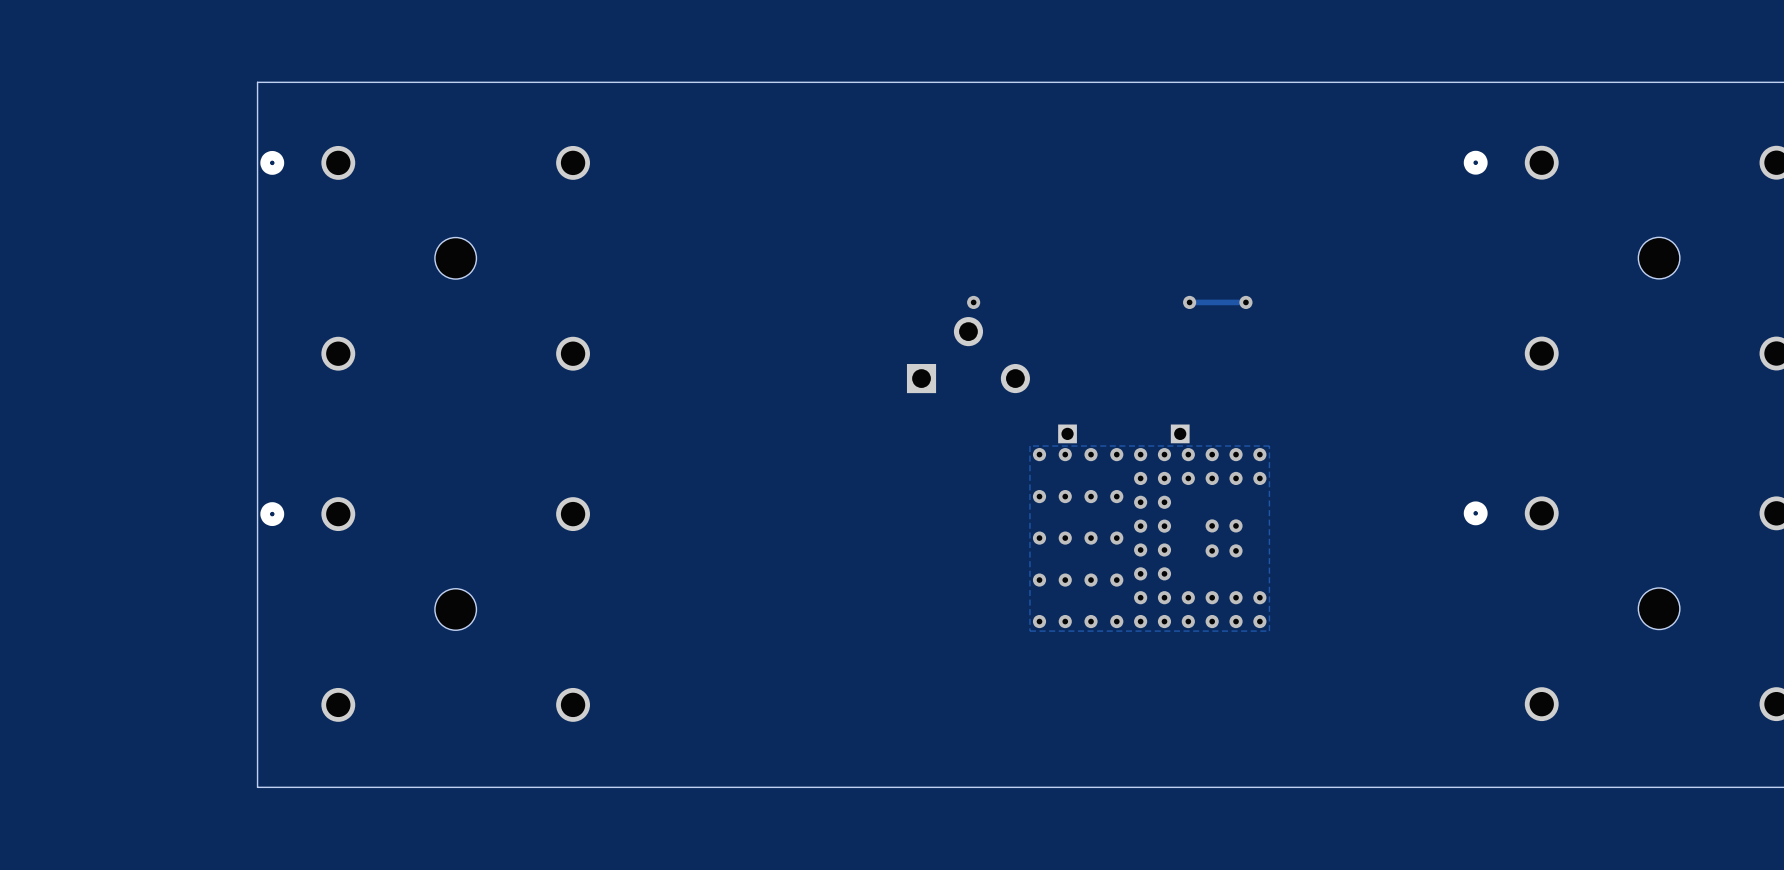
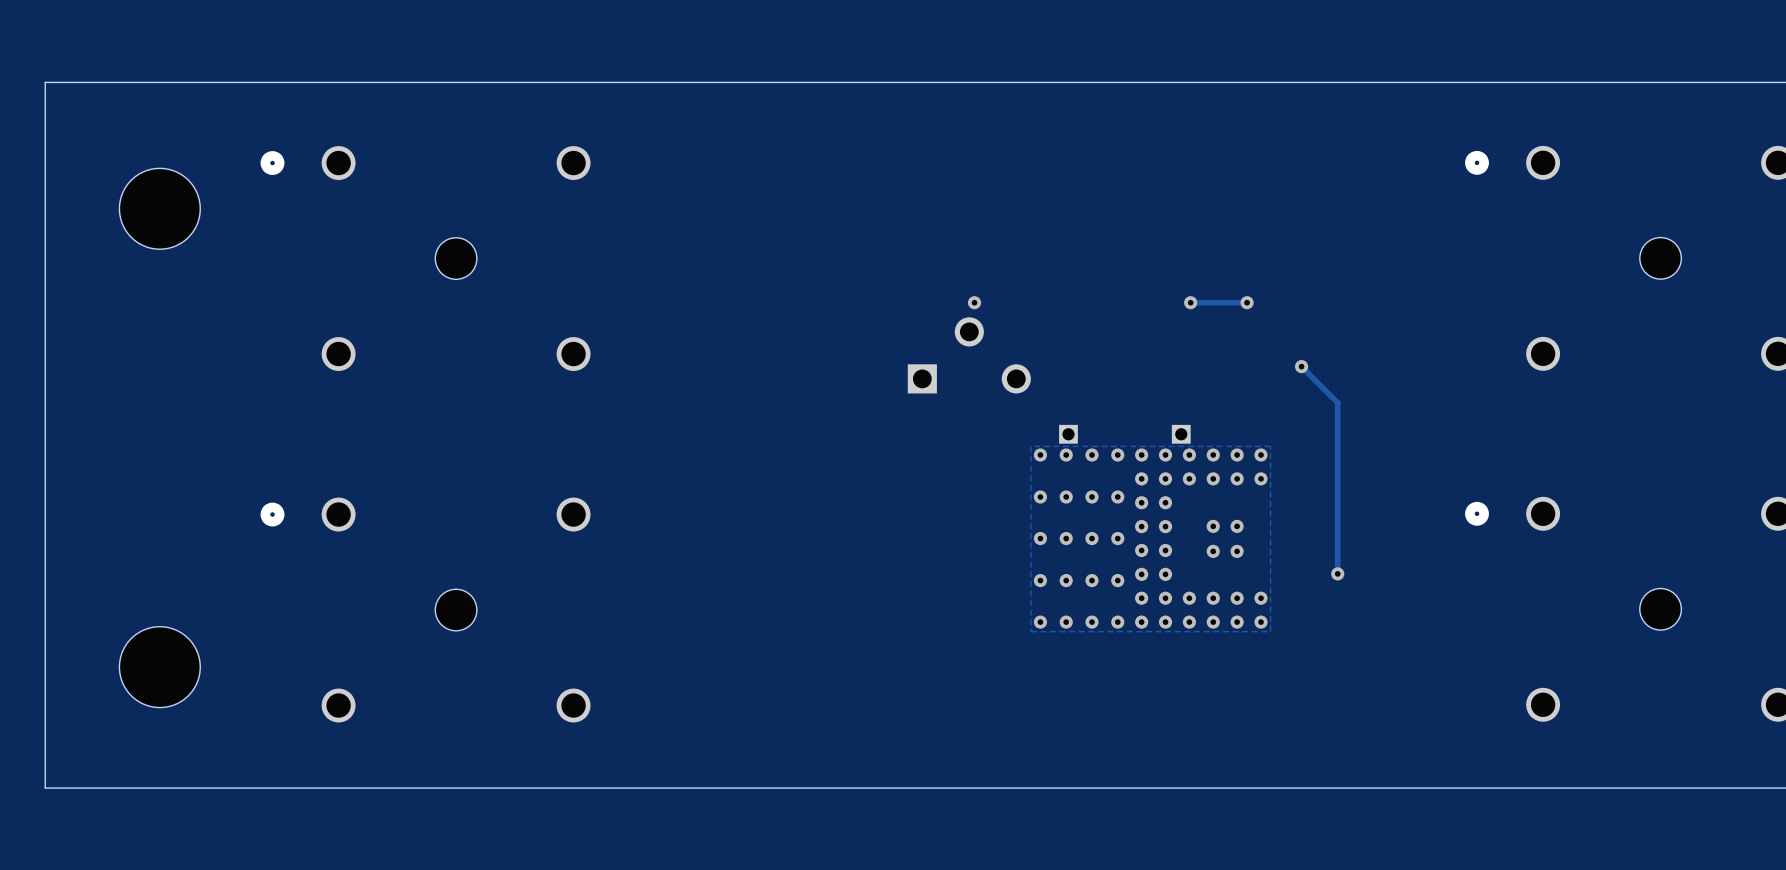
board edge: (257, 82) (257, 787) -> (257, 82) (45, 82) (45, 788) (257, 788)
part: none -> (159, 208)
track: none -> (1301, 366) (1337, 402) (1337, 573)
via: none -> (1301, 366)
via: none -> (1337, 573)
part: none -> (159, 667)

